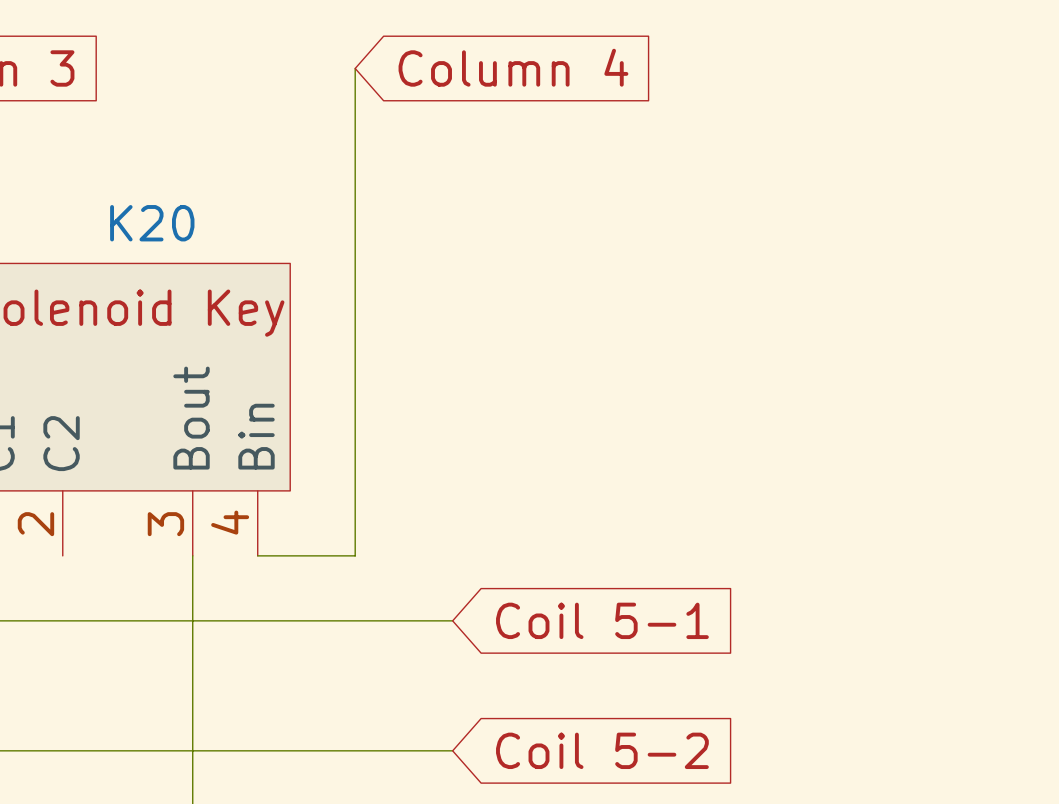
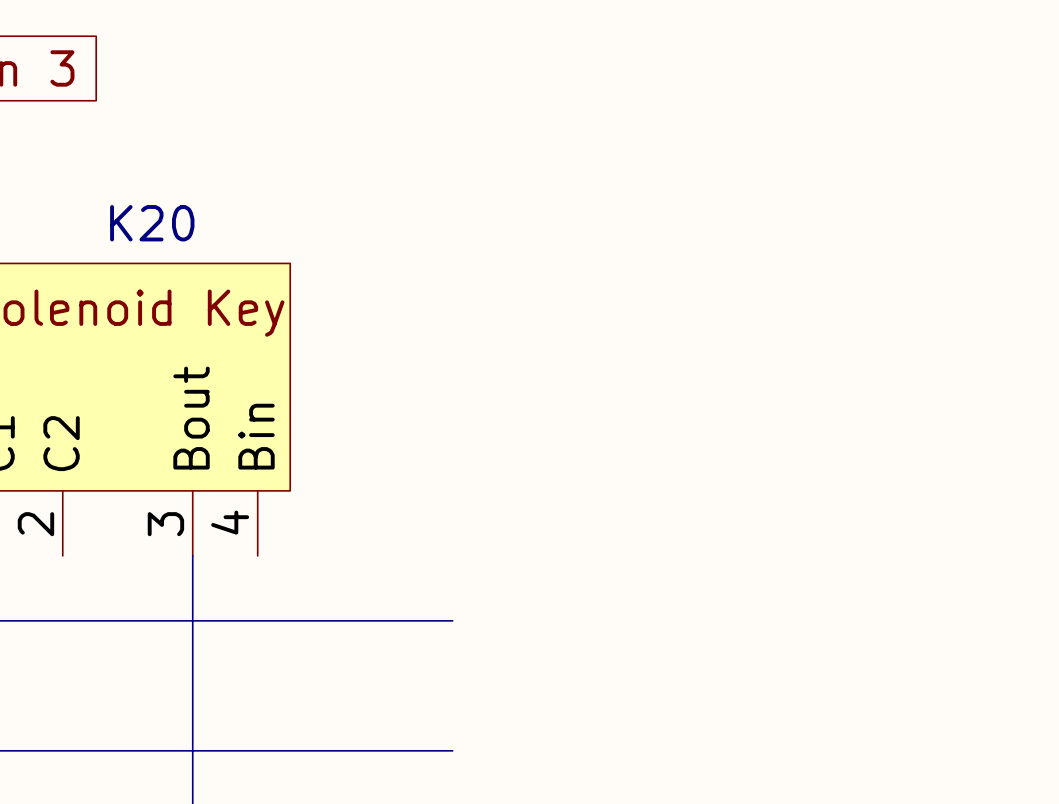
global label: Column 4 (513, 67) -> none
wire: (355, 68) (355, 555) (257, 555) -> none
global label: Coil 5-1 (602, 620) -> none
global label: Coil 5-2 (602, 750) -> none

